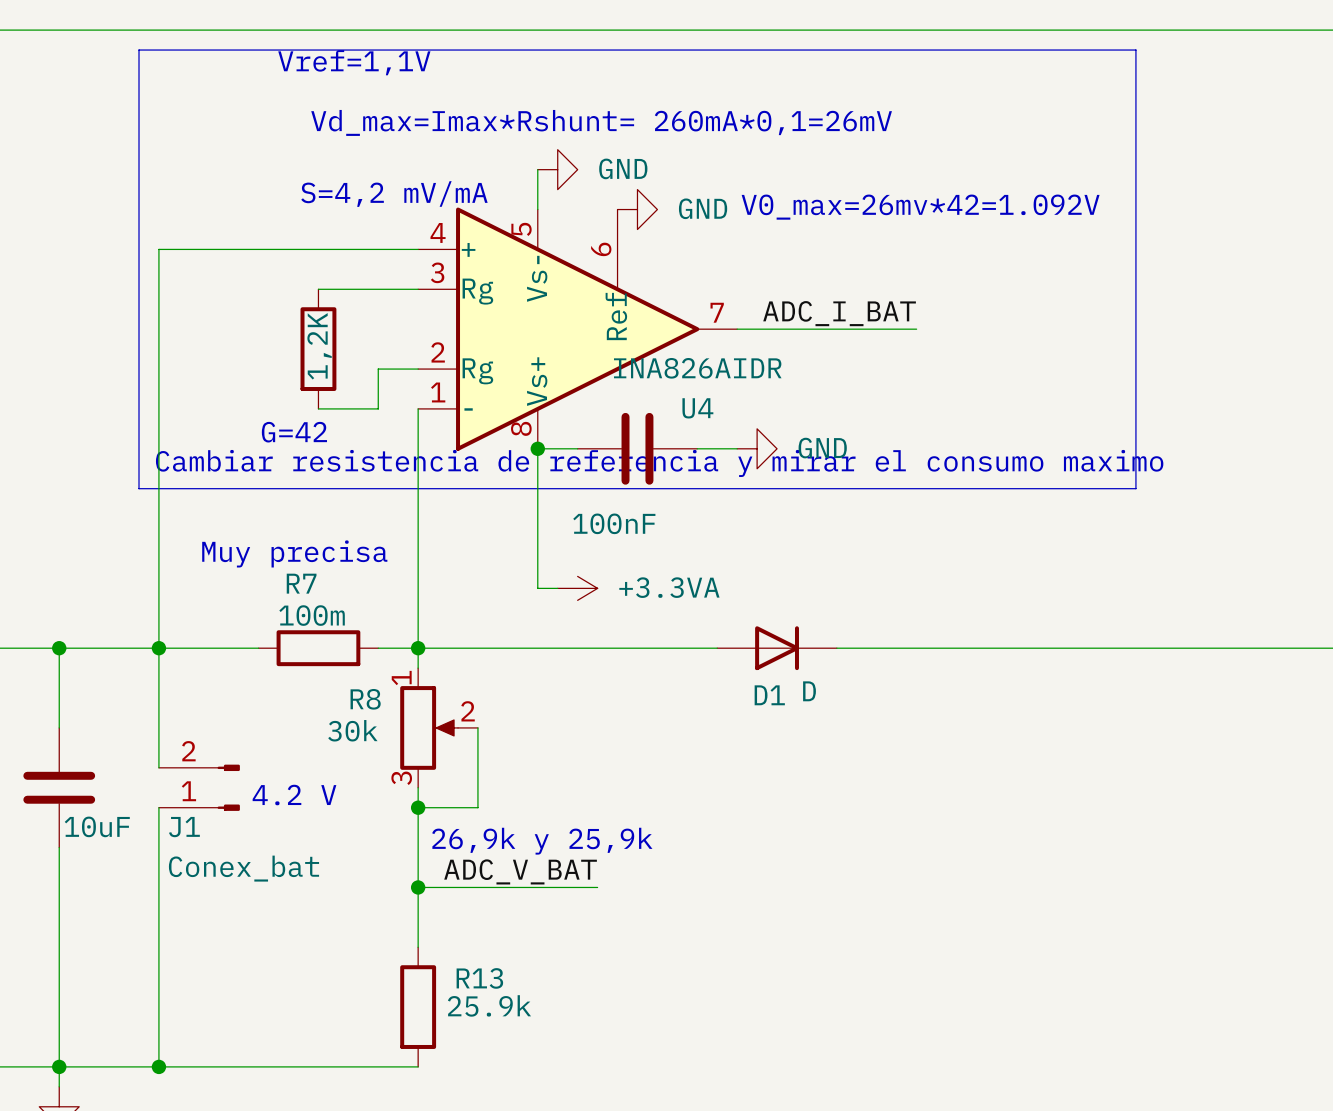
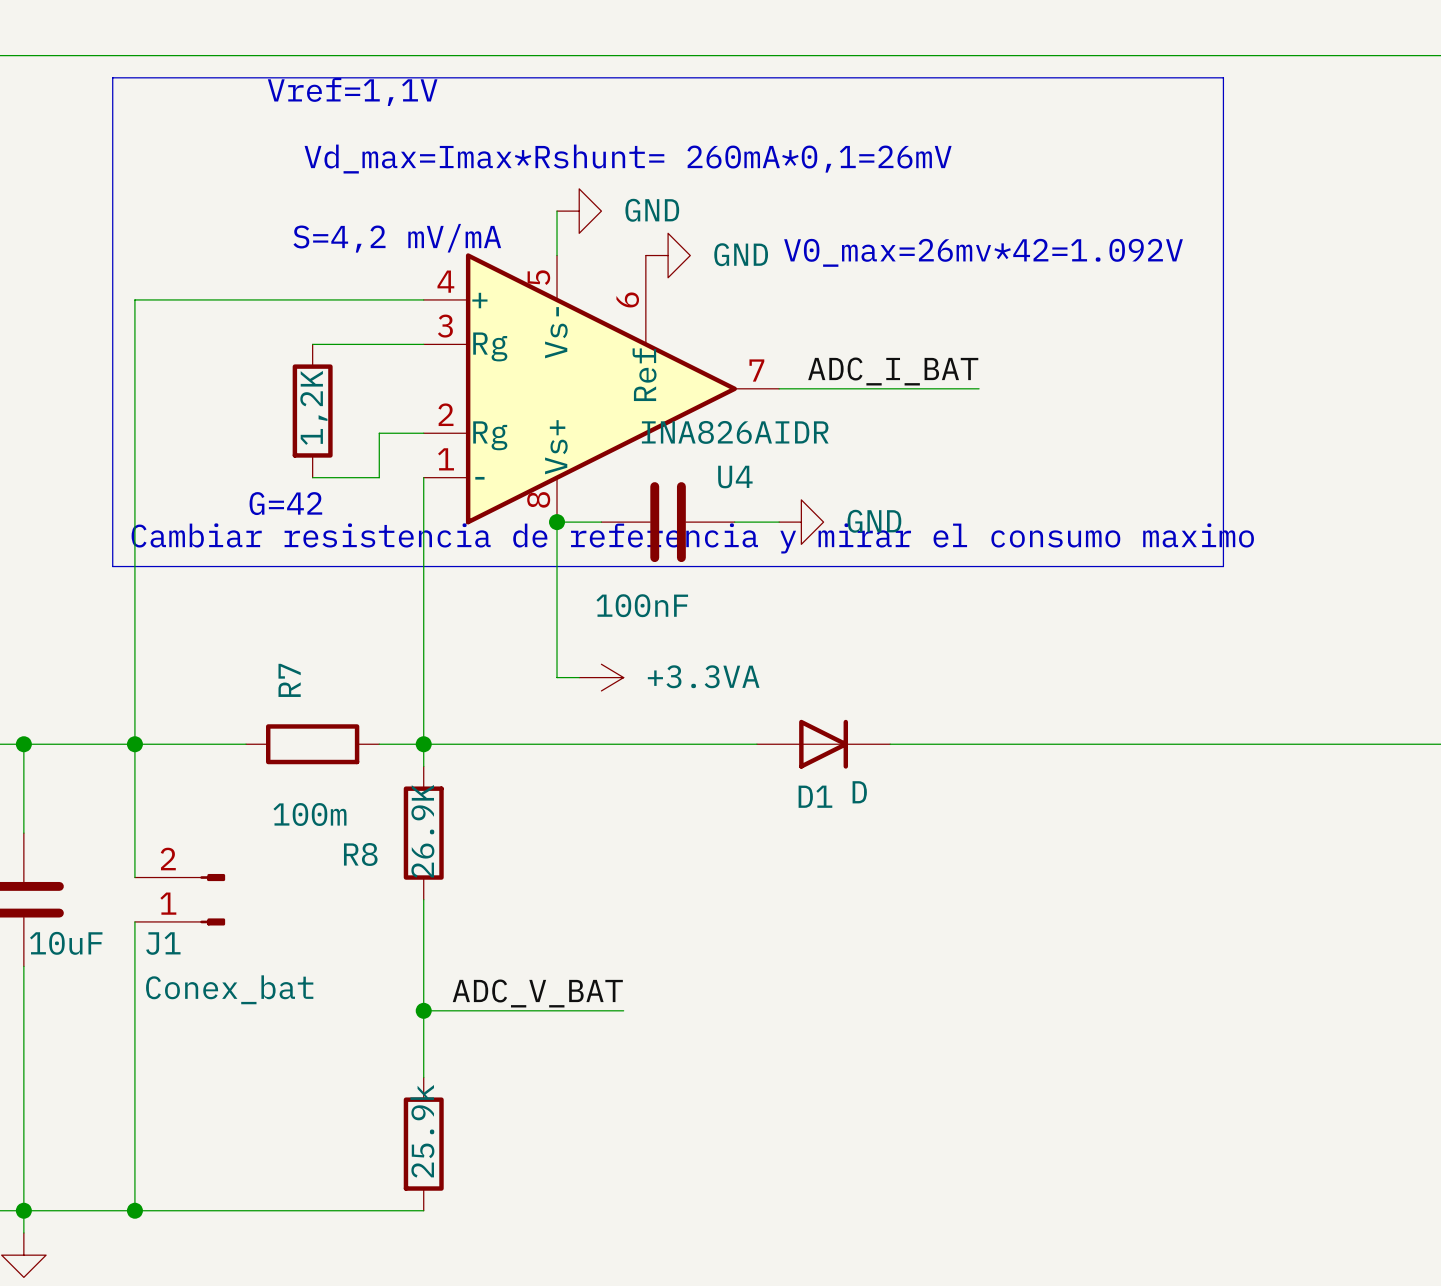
text: Muy precisa (294, 553) -> none
R7 name rotation: 0° (301, 583) -> 90° counterclockwise (289, 680)
R7 value position: 100m (312, 615) -> 100m (309, 814)
R8 symbol: [400, 668, 478, 788] -> [403, 766, 444, 900]
R8 name position: R8 (365, 699) -> R8 (360, 854)
wire: (477, 727) (477, 807) (418, 807) -> none
R8 value: 30k (352, 730) -> 26.9K (422, 831)
text: 4.2 V (294, 795) -> none
junction: (418, 807) -> none
text: 26,9k y 25,9k (542, 841) -> none
R13 name: R13 (479, 978) -> none
R13 value rotation: 0° (489, 1005) -> 90° counterclockwise (422, 1131)

